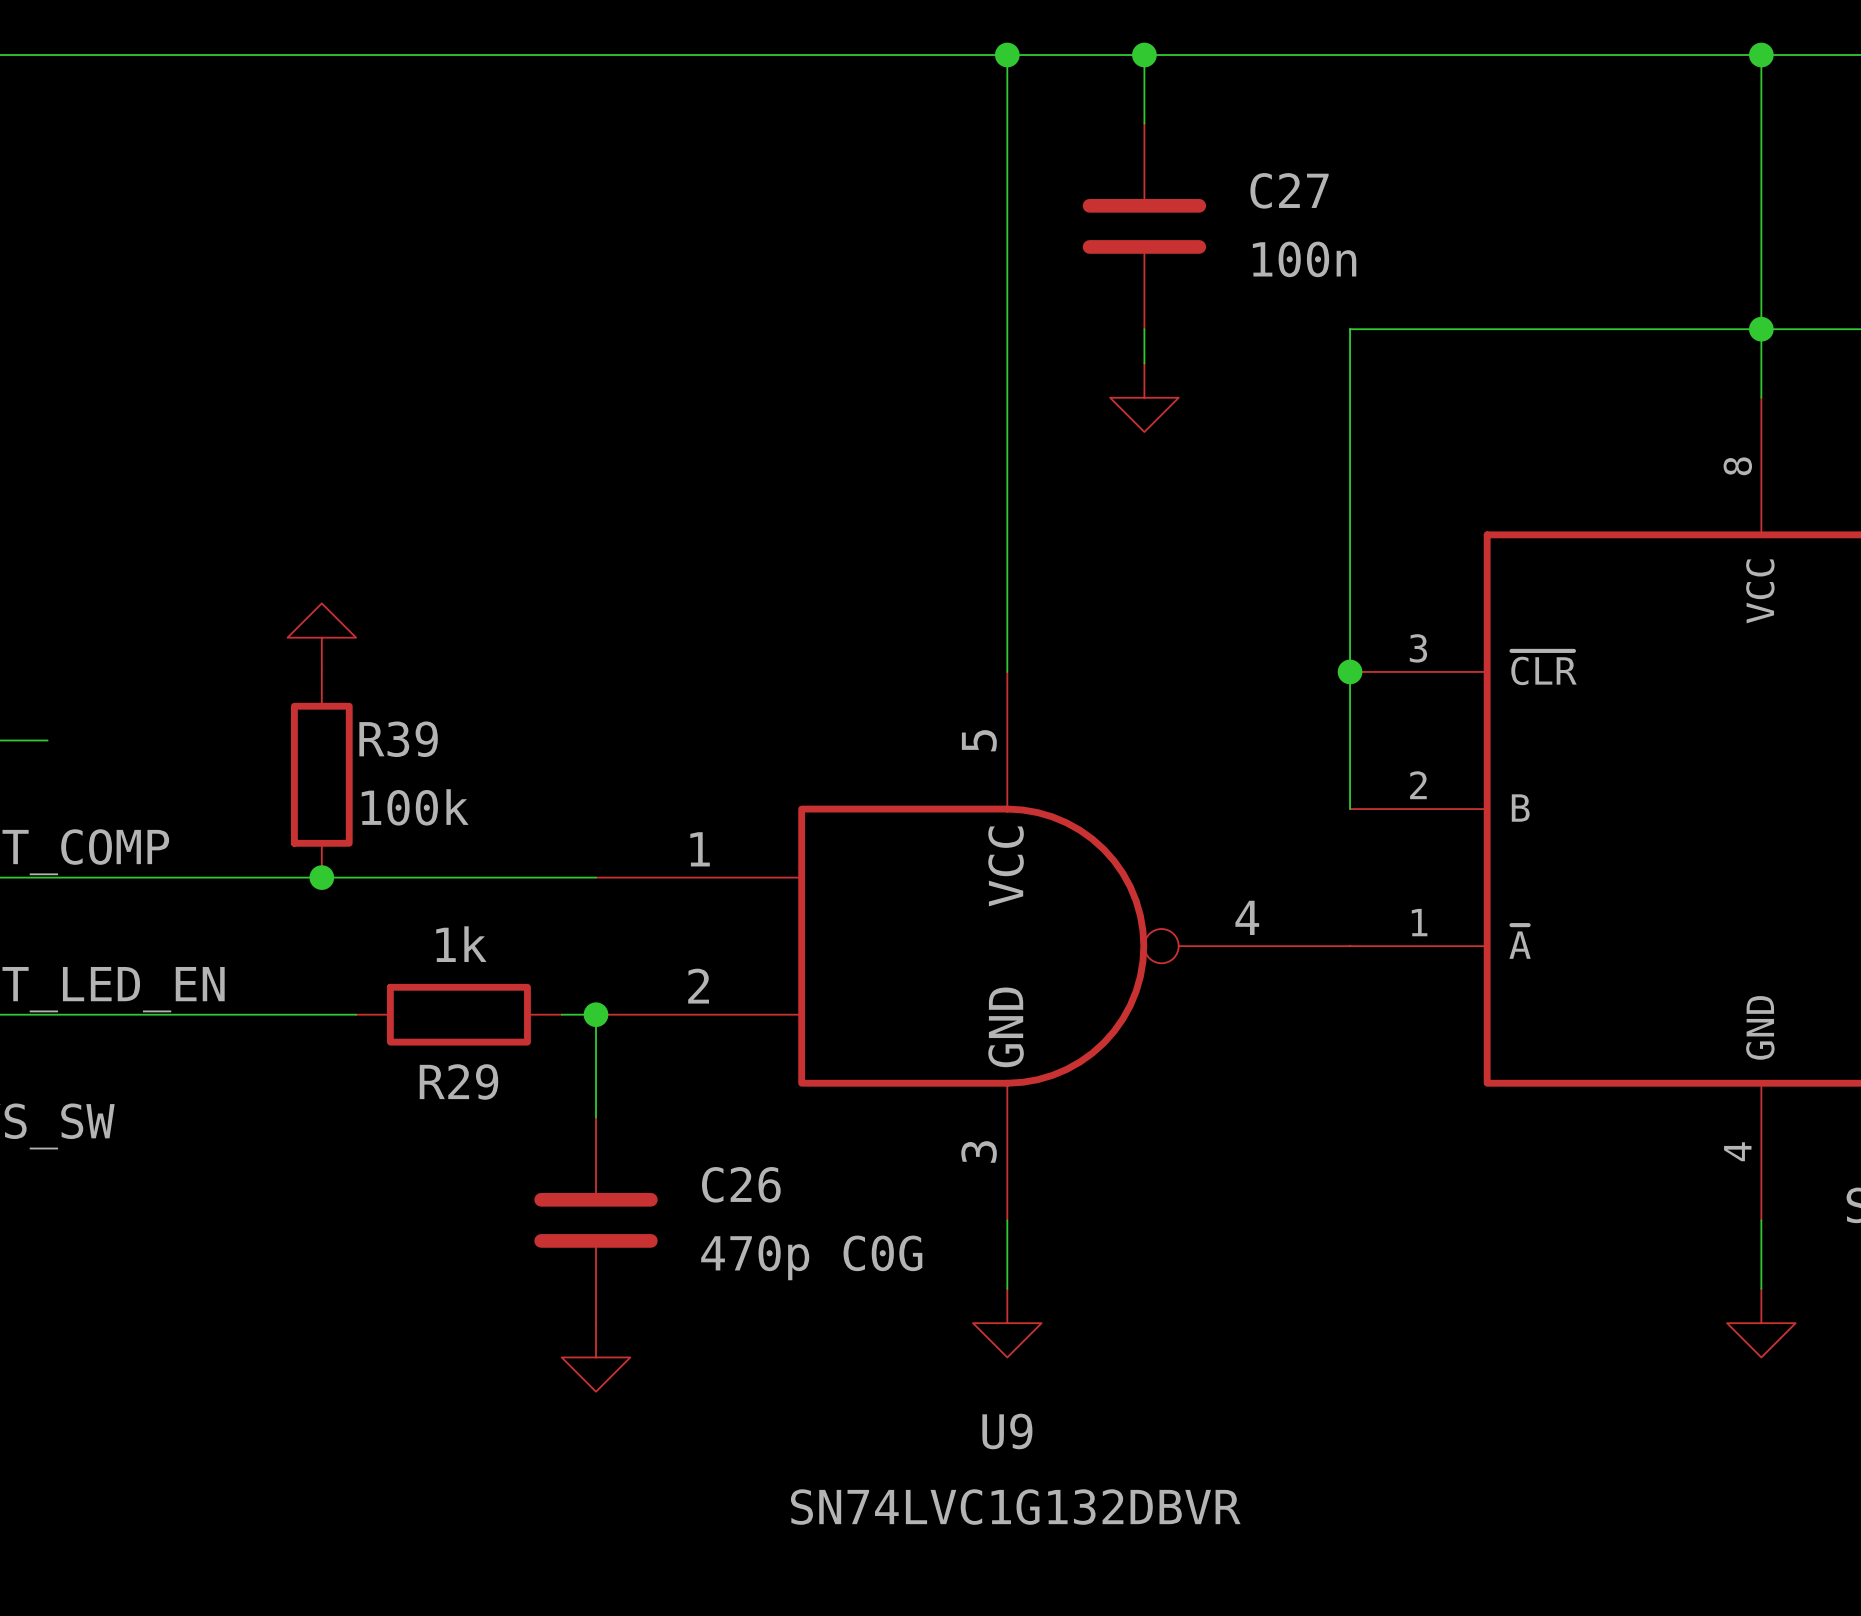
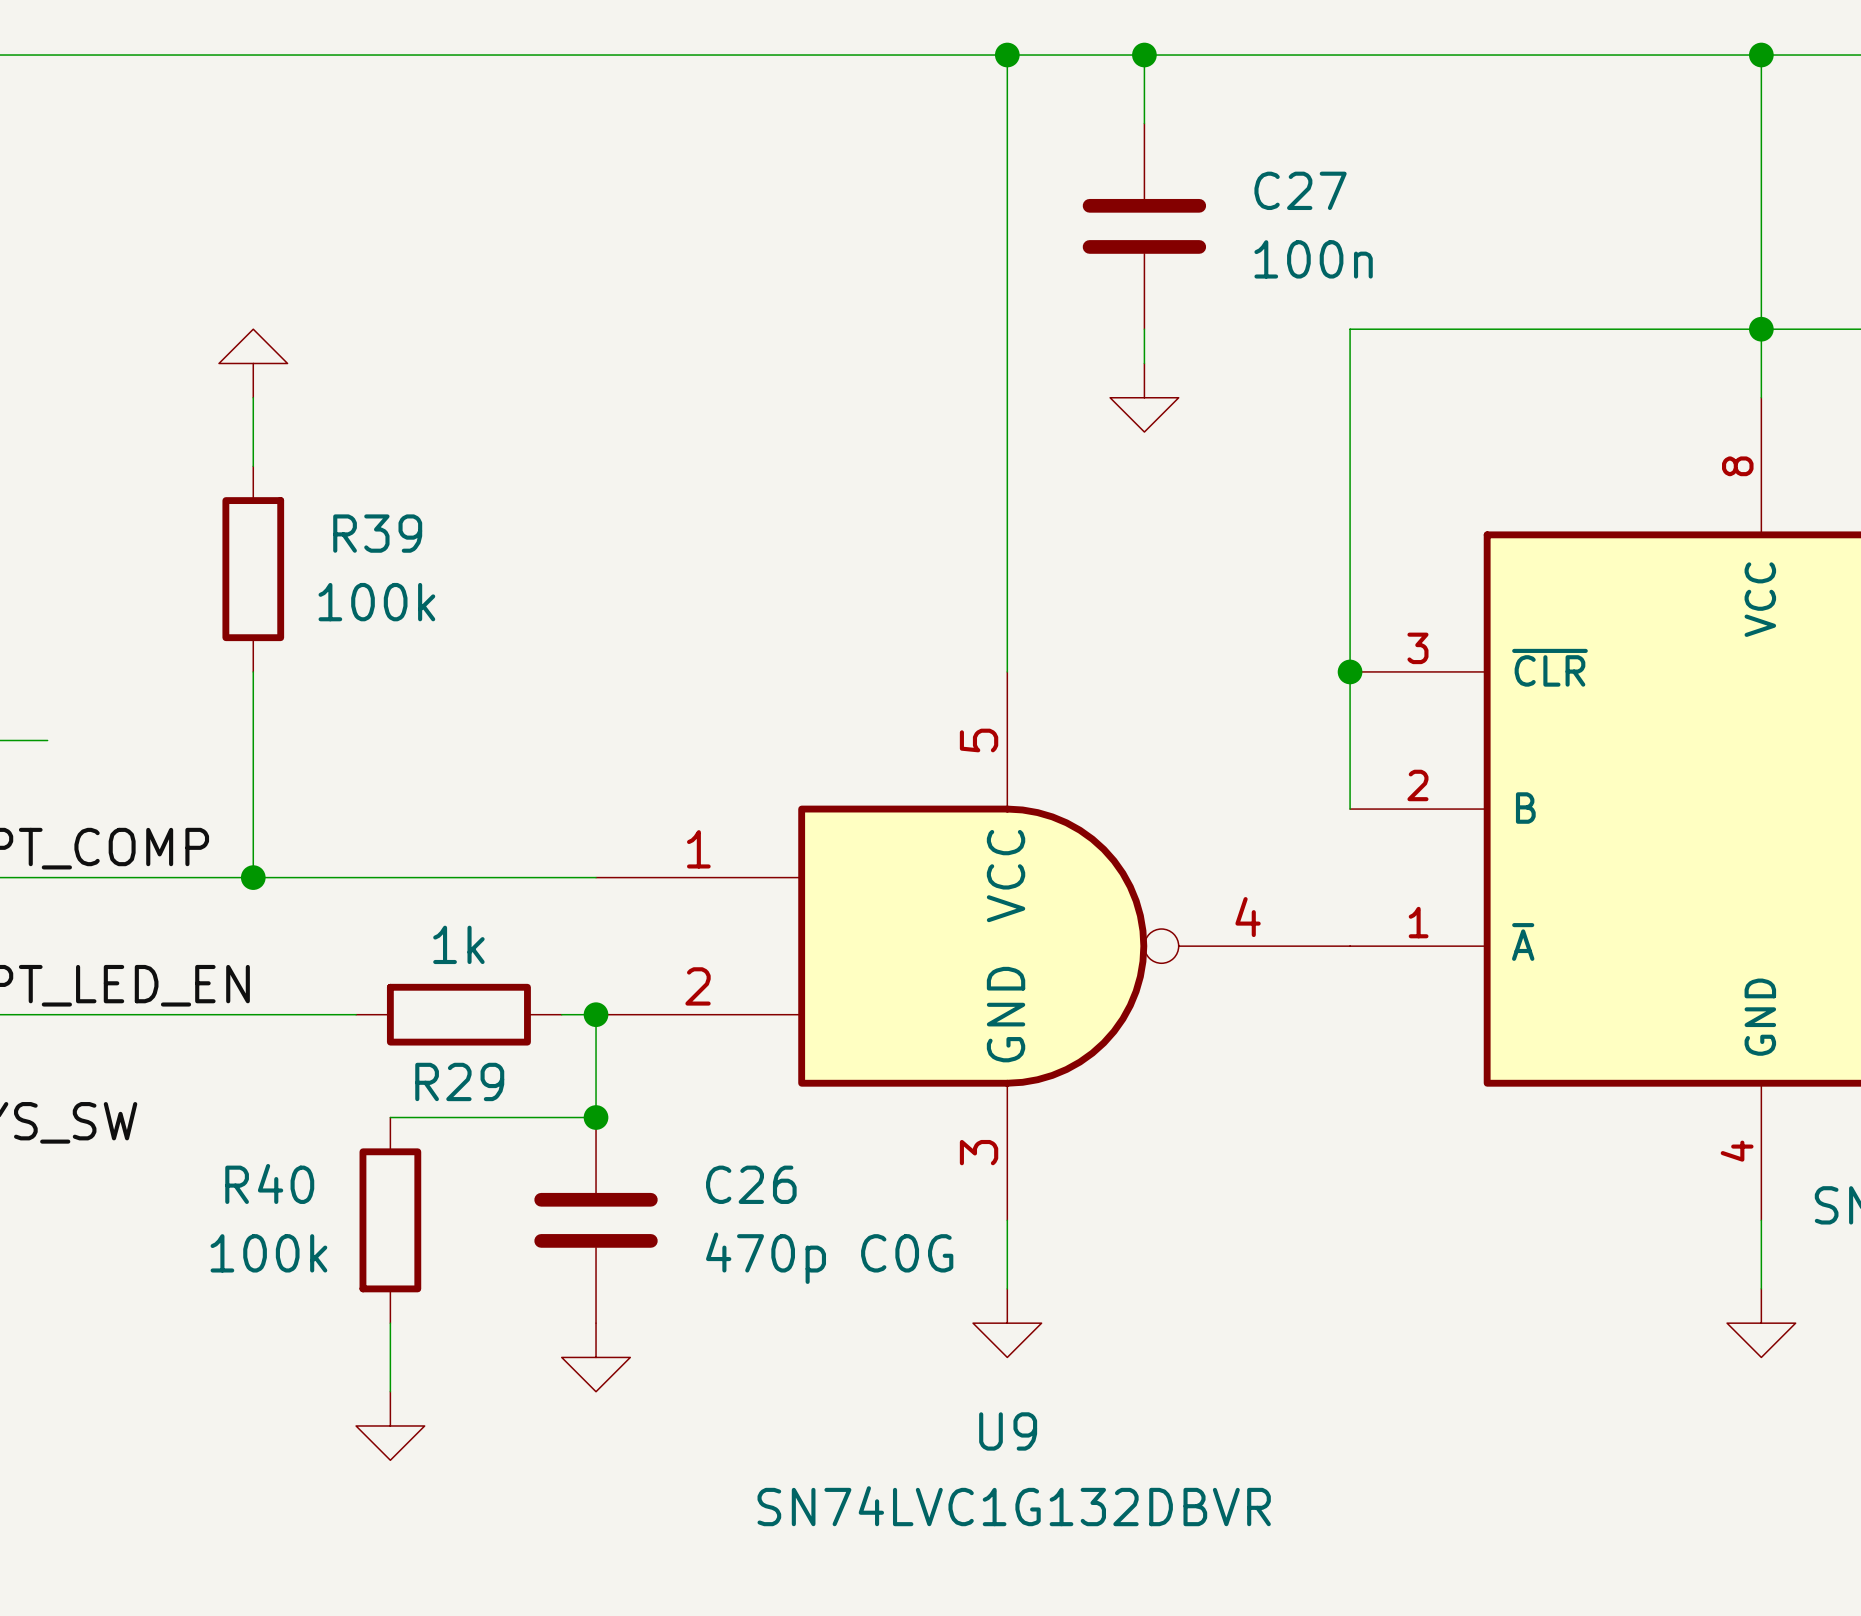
wire: none -> (253, 397) (253, 466)
power symbol position: (321, 637) -> (253, 363)
wire: none -> (253, 671) (253, 877)
R39 name position: R39 (398, 739) -> R39 (377, 533)
R39 position: (321, 774) -> (253, 569)
R39 value position: 100k (415, 807) -> 100k (376, 602)
junction position: (321, 877) -> (253, 877)
wire: none -> (390, 1117) (596, 1117)
junction: none -> (596, 1117)
R40: none -> 100k (390, 1220)
wire: none -> (390, 1323) (390, 1391)
power symbol: none -> (390, 1425)

